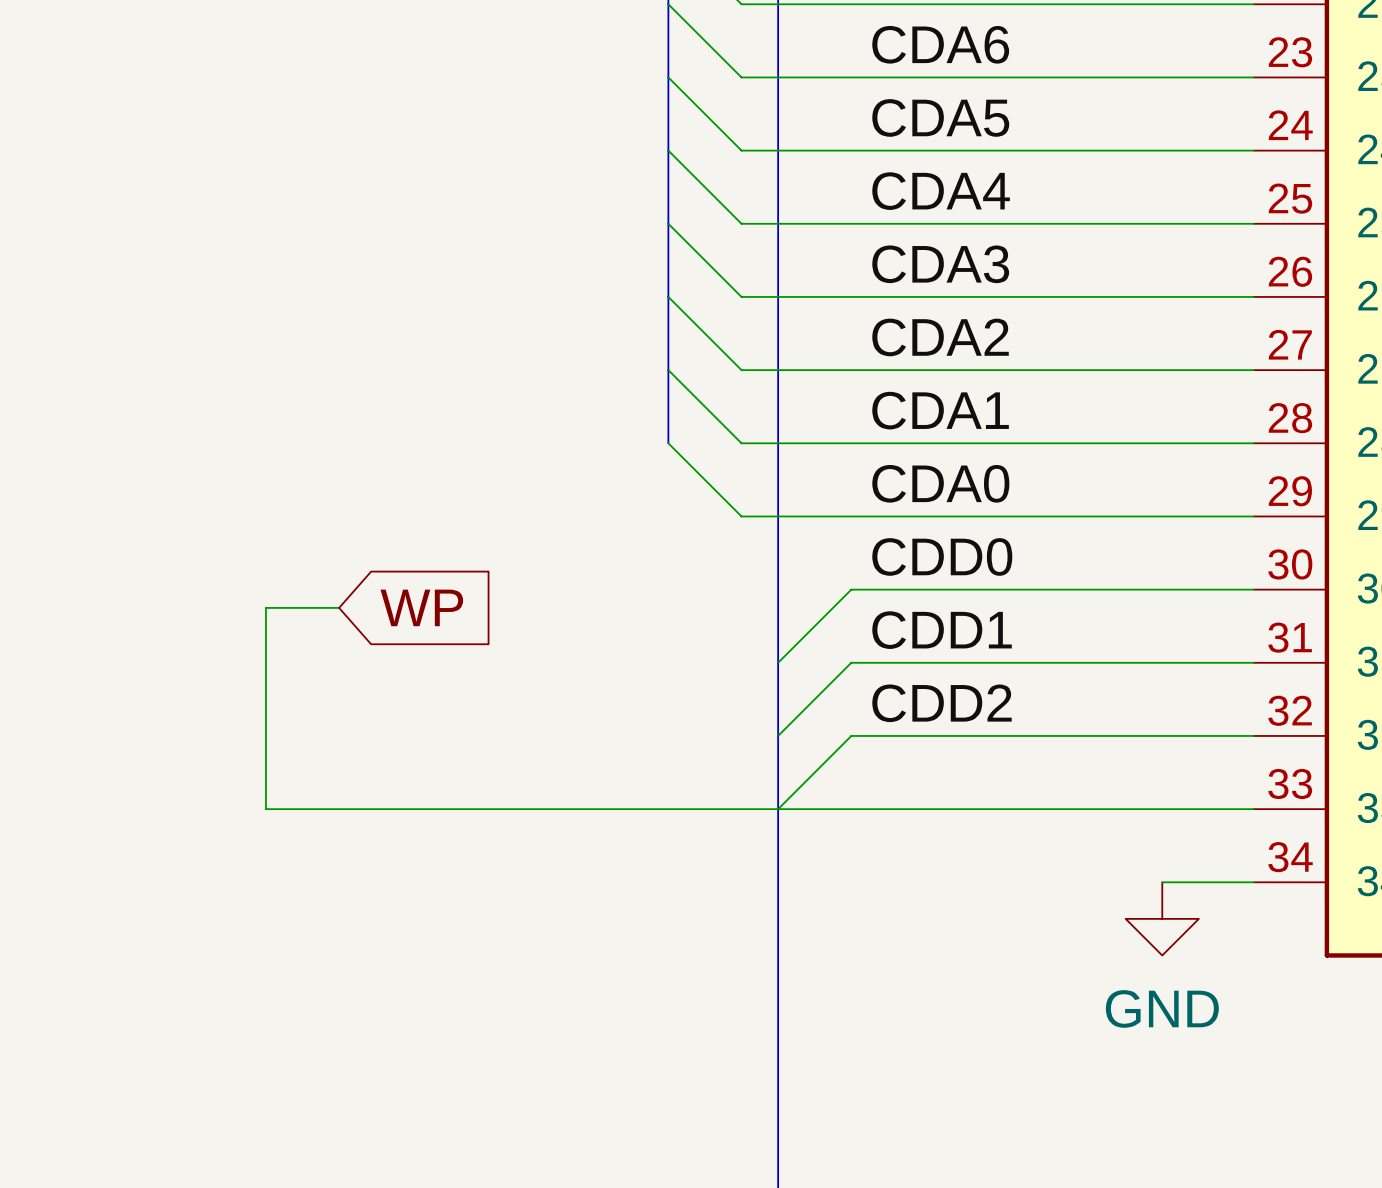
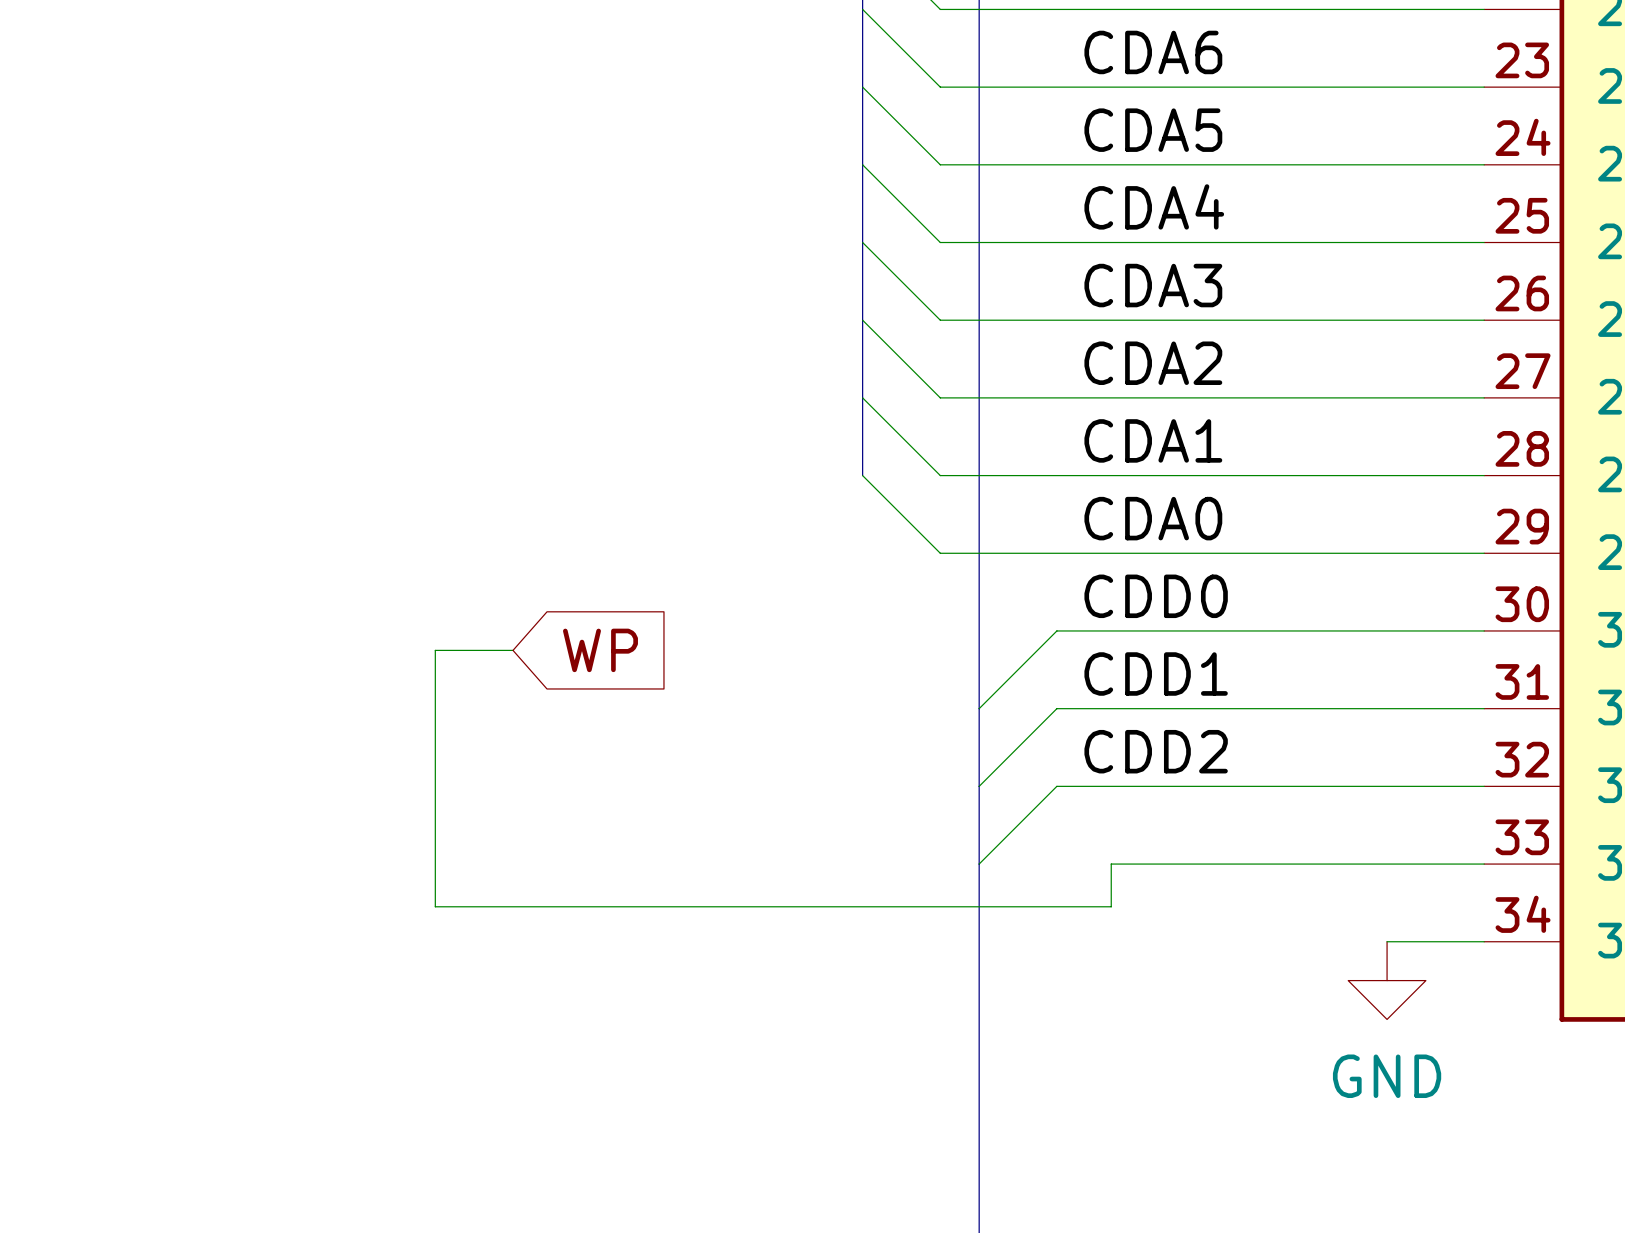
wire: (265, 809) (902, 809) -> (435, 864) (435, 906) (1111, 906) (1111, 864)

